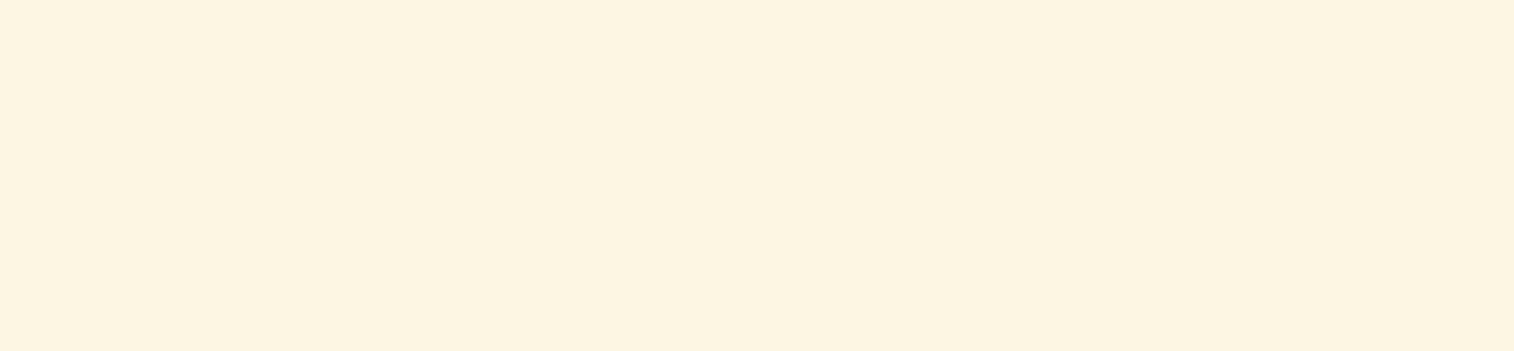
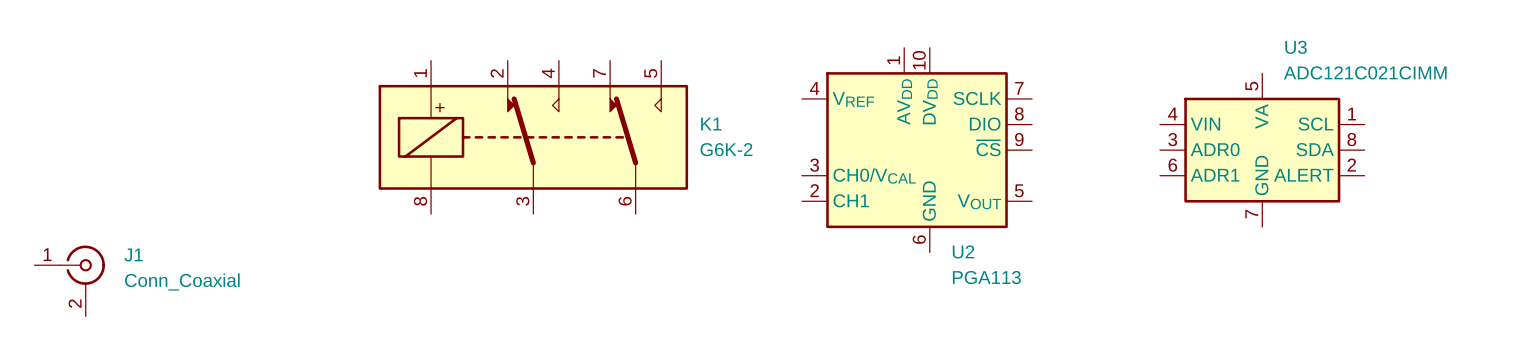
K1: none -> G6K-2 (533, 137)
U2: none -> PGA113 (917, 150)
U3: none -> ADC121C021CIMM (1262, 150)
J1: none -> Conn_Coaxial (69, 280)

